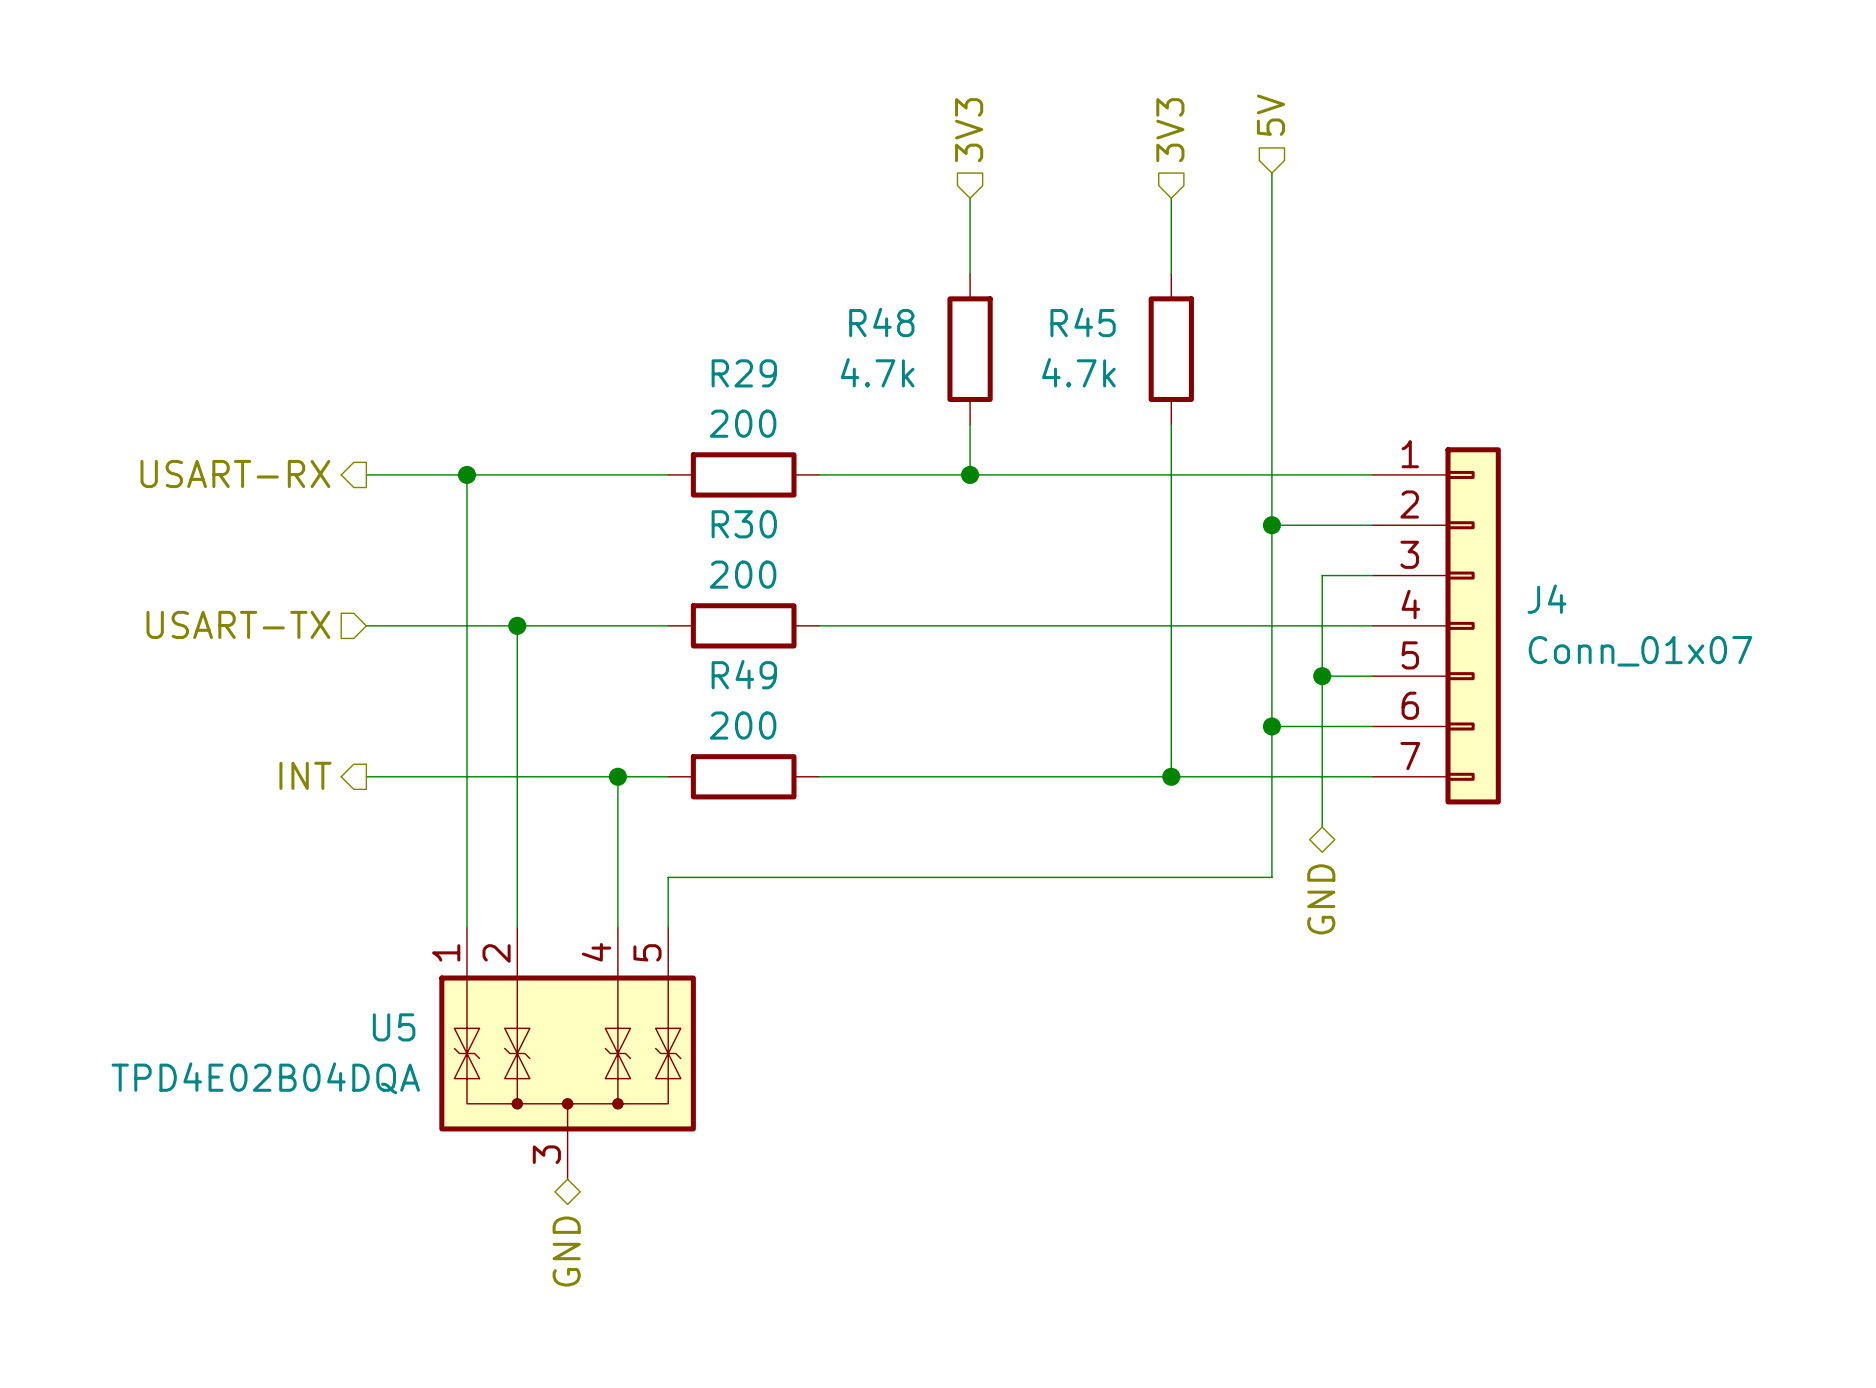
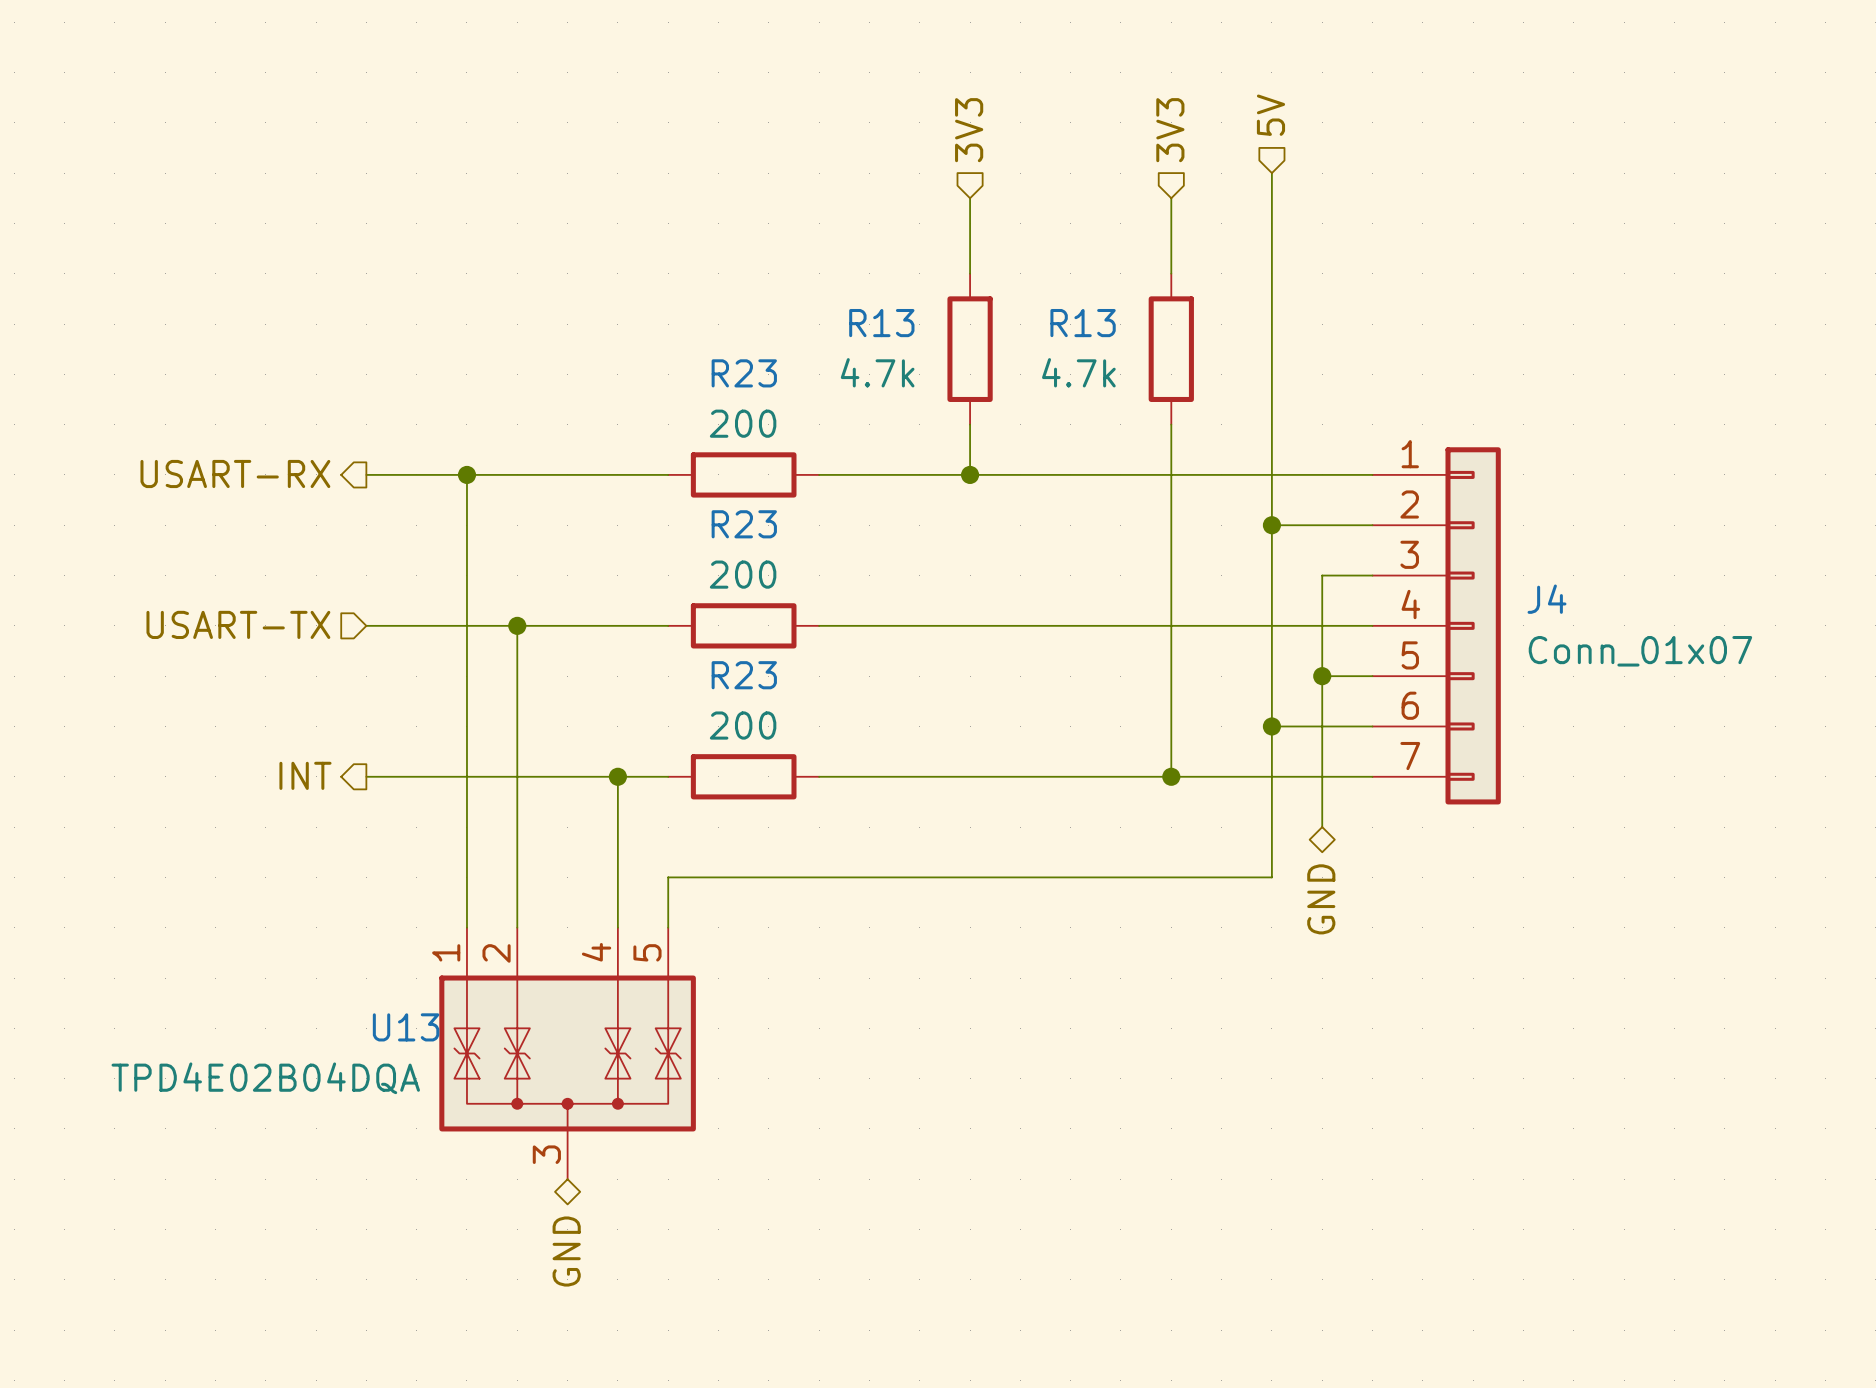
R48 name: R48 (881, 322) -> R13 (881, 323)
R45 name: R45 (1083, 322) -> R13 (1083, 323)
R29 name: R29 (744, 373) -> R23 (744, 373)
R30 name: R30 (744, 524) -> R23 (744, 524)
R49 name: R49 (744, 674) -> R23 (744, 675)
U5 name: U5 (394, 1027) -> U13 (406, 1027)

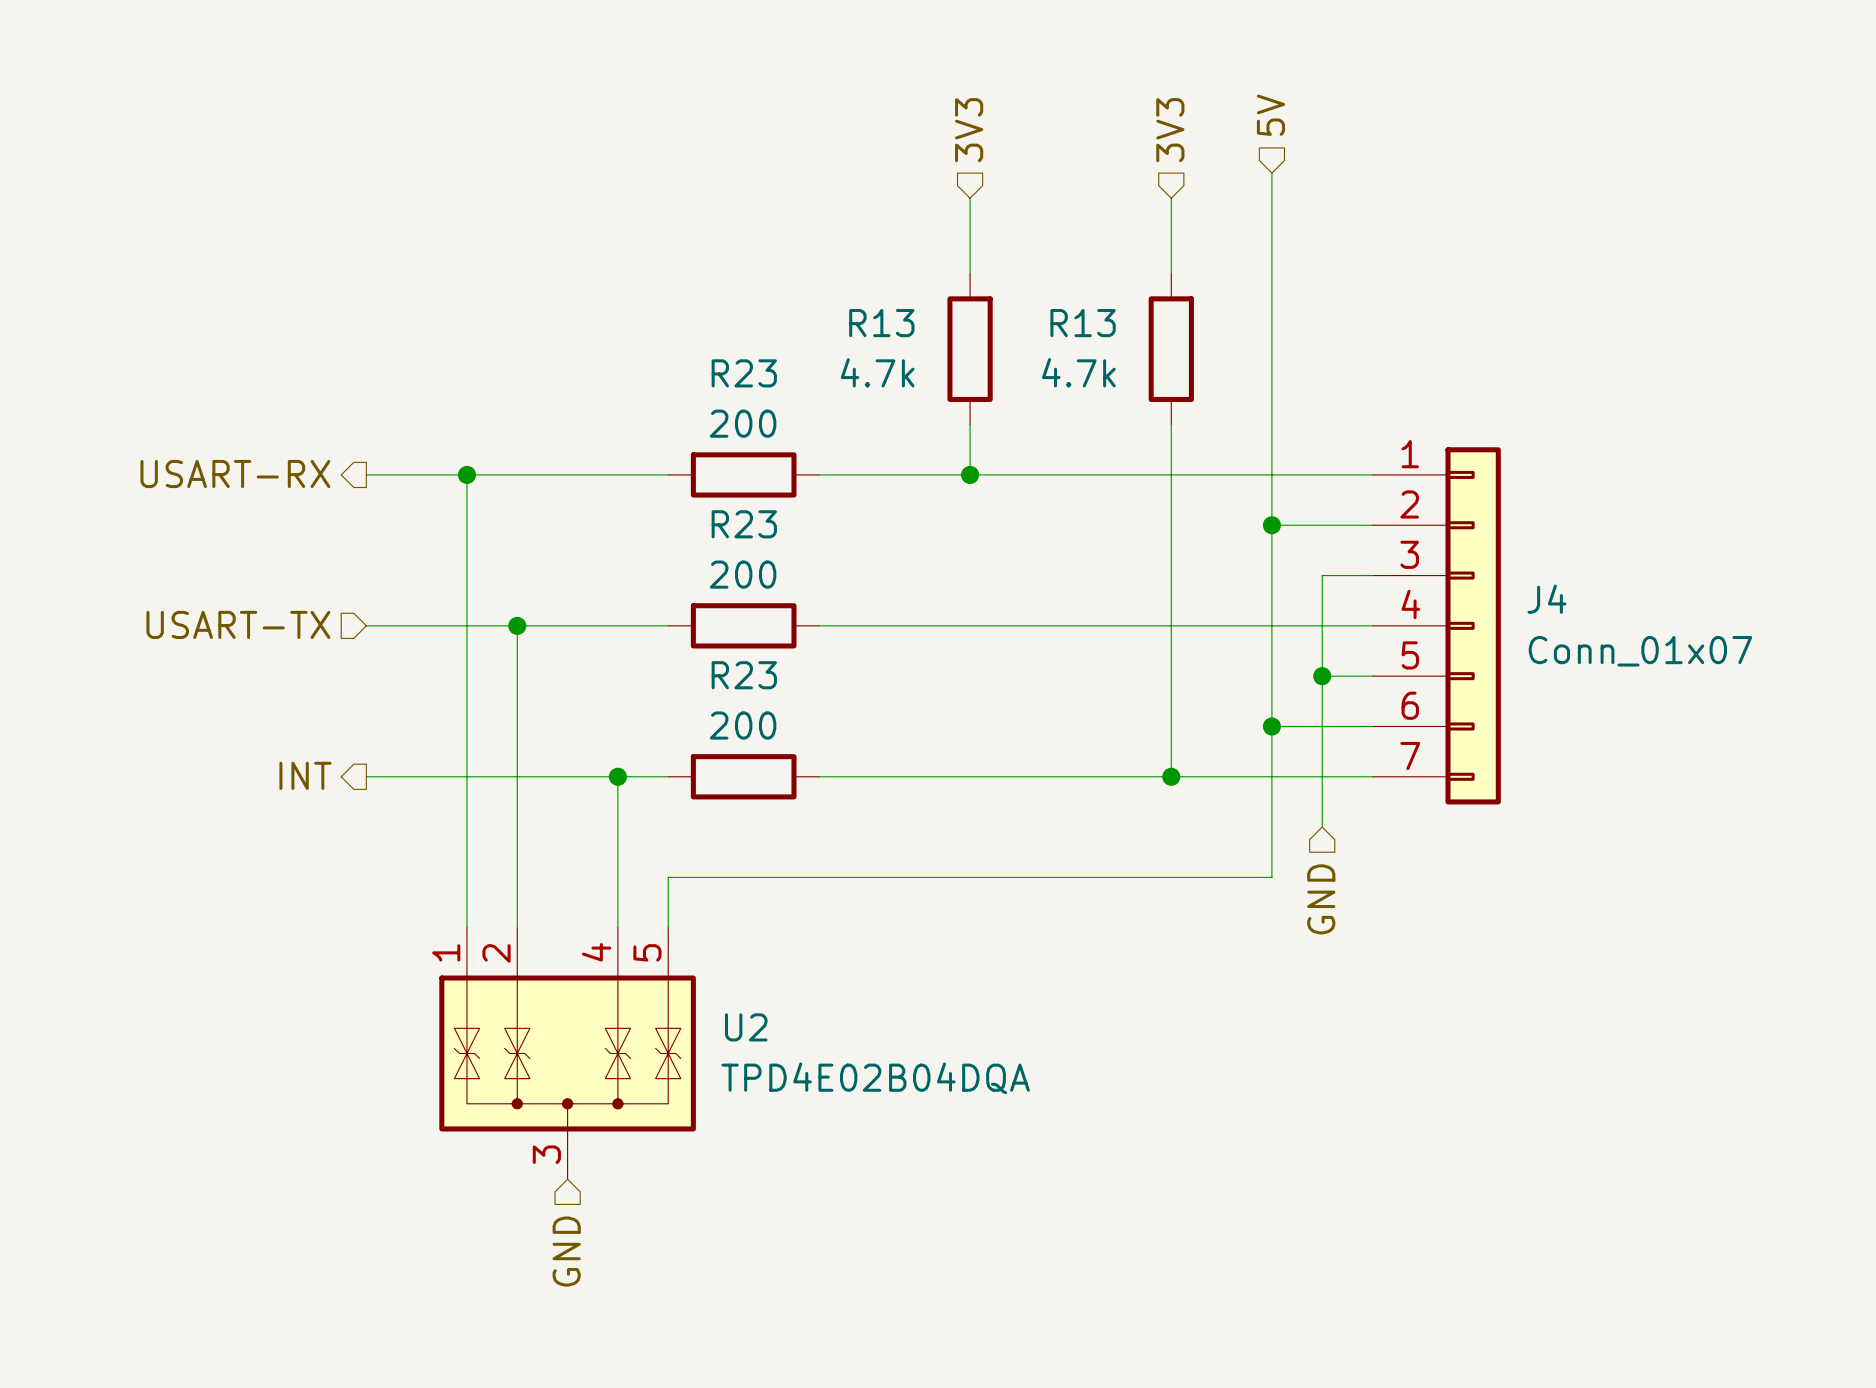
hierarchical label shape: bidirectional (1321, 899) -> input (1321, 899)
U13 name: U13 (406, 1027) -> U2 (746, 1027)
U13 value position: TPD4E02B04DQA (265, 1078) -> TPD4E02B04DQA (875, 1078)
hierarchical label shape: bidirectional (566, 1251) -> input (566, 1251)

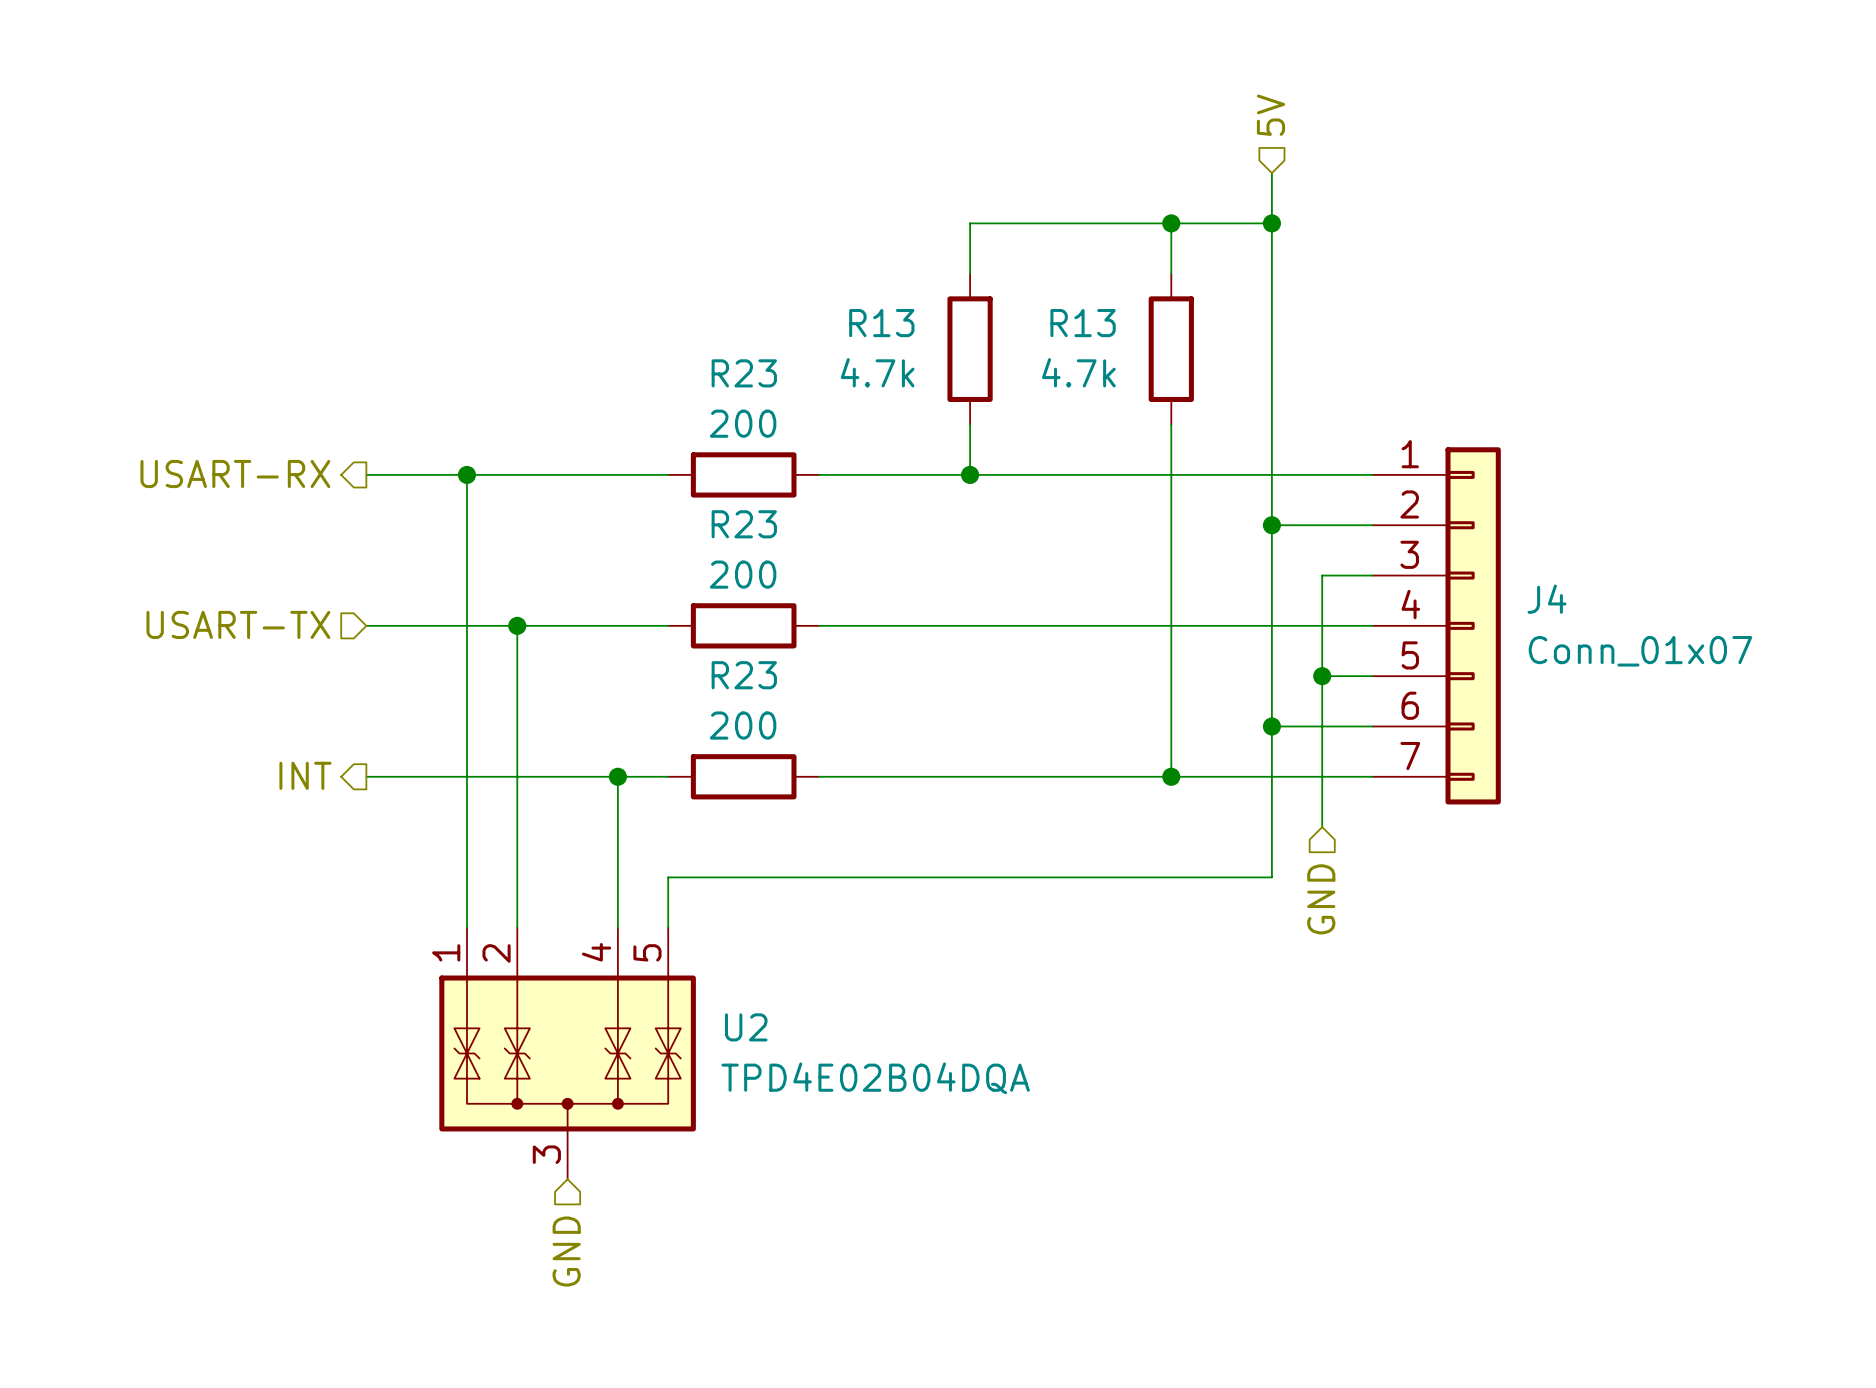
hierarchical label: 3V3 (969, 130) -> none
hierarchical label: 3V3 (1170, 130) -> none
wire: (970, 198) (970, 223) -> (1271, 223) (970, 223)
wire: (1171, 198) (1171, 223) -> none
junction: none -> (1171, 223)
junction: none -> (1271, 223)

